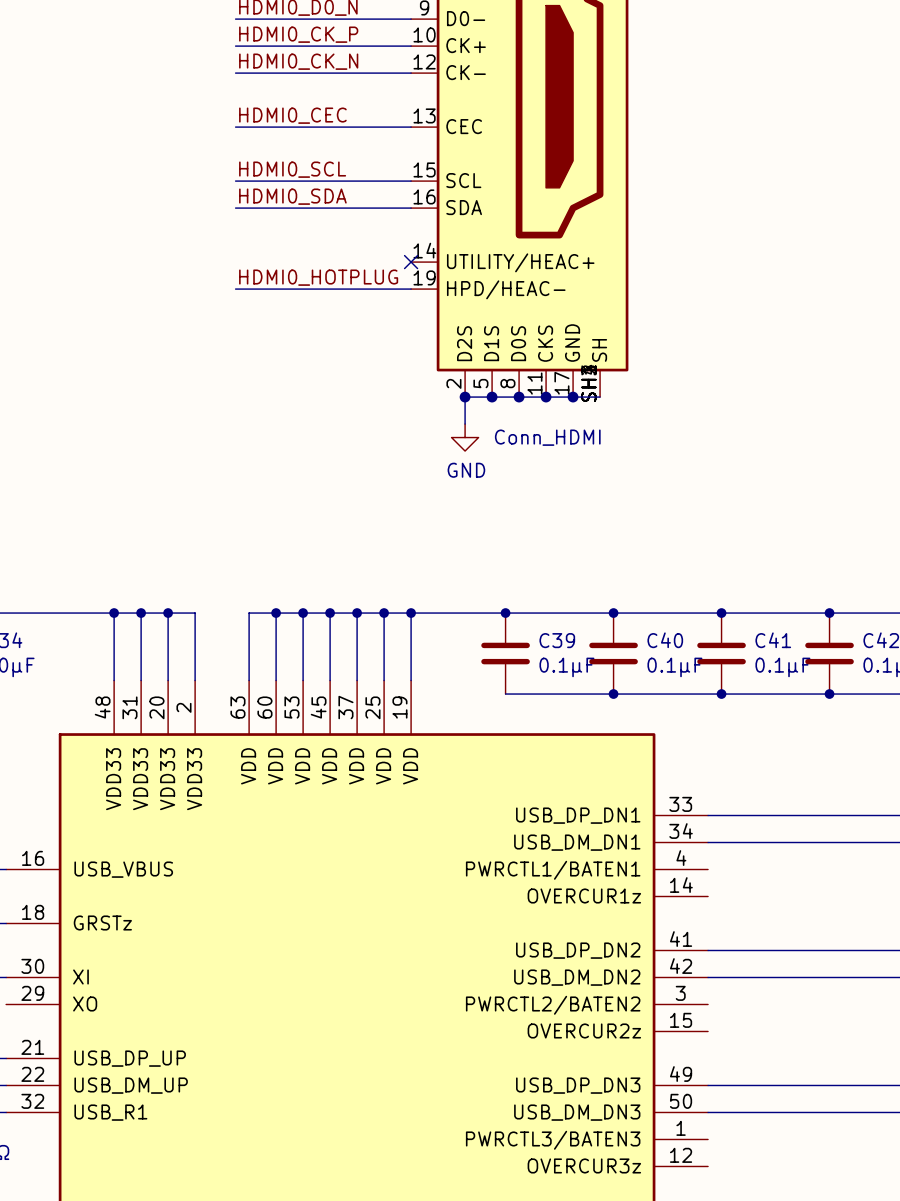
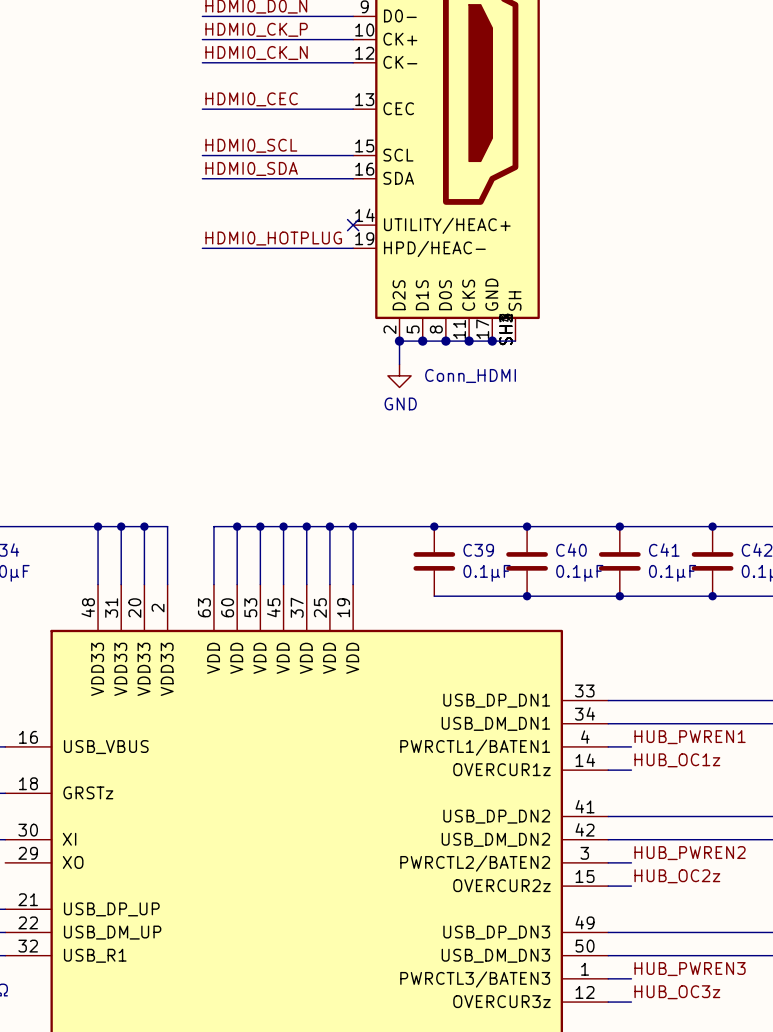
label: none -> HUB_PWREN1 (690, 737)
wire: none -> (608, 746) (631, 746)
label: none -> HUB_OC1z (677, 760)
wire: none -> (608, 770) (631, 770)
label: none -> HUB_PWREN2 (690, 853)
wire: none -> (608, 862) (631, 862)
label: none -> HUB_OC2z (677, 876)
wire: none -> (608, 886) (631, 886)
label: none -> HUB_PWREN3 (690, 969)
wire: none -> (608, 978) (631, 978)
label: none -> HUB_OC3z (677, 992)
wire: none -> (608, 1002) (631, 1002)

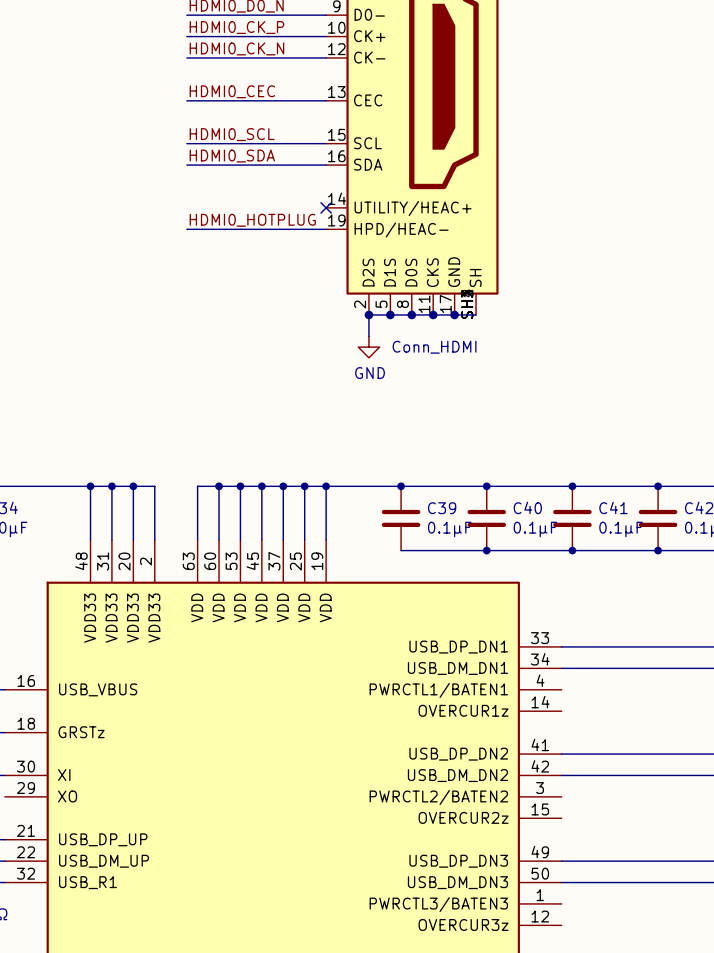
label: HUB_PWREN1 (690, 737) -> none
wire: (608, 746) (631, 746) -> none
label: HUB_OC1z (677, 760) -> none
wire: (608, 770) (631, 770) -> none
label: HUB_PWREN2 (690, 853) -> none
wire: (608, 862) (631, 862) -> none
label: HUB_OC2z (677, 876) -> none
wire: (608, 886) (631, 886) -> none
label: HUB_PWREN3 (690, 969) -> none
wire: (608, 978) (631, 978) -> none
label: HUB_OC3z (677, 992) -> none
wire: (608, 1002) (631, 1002) -> none

